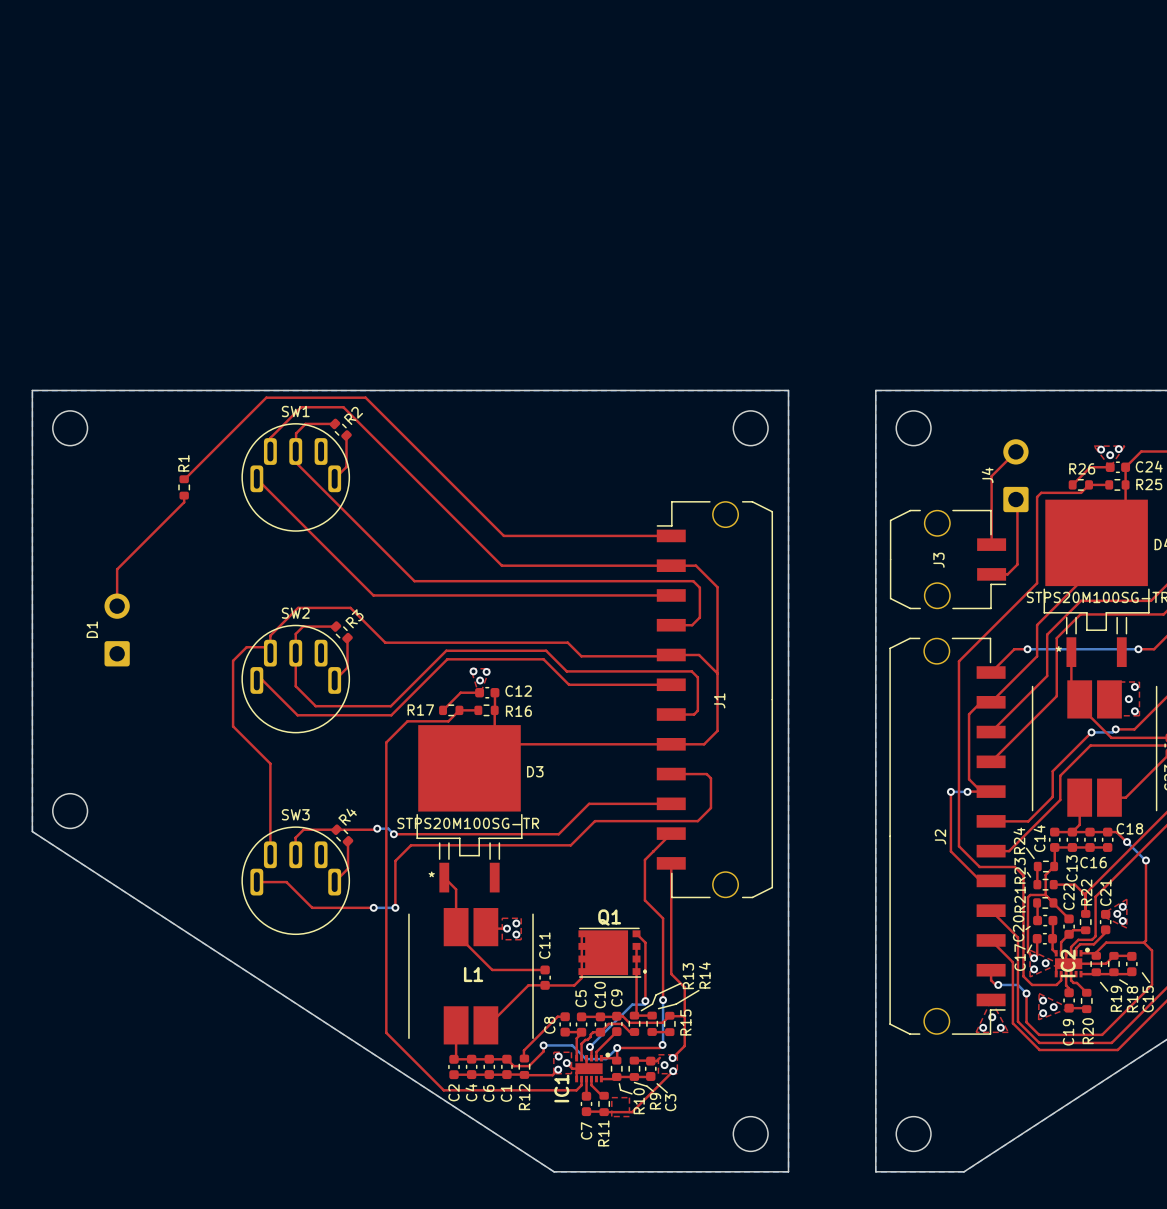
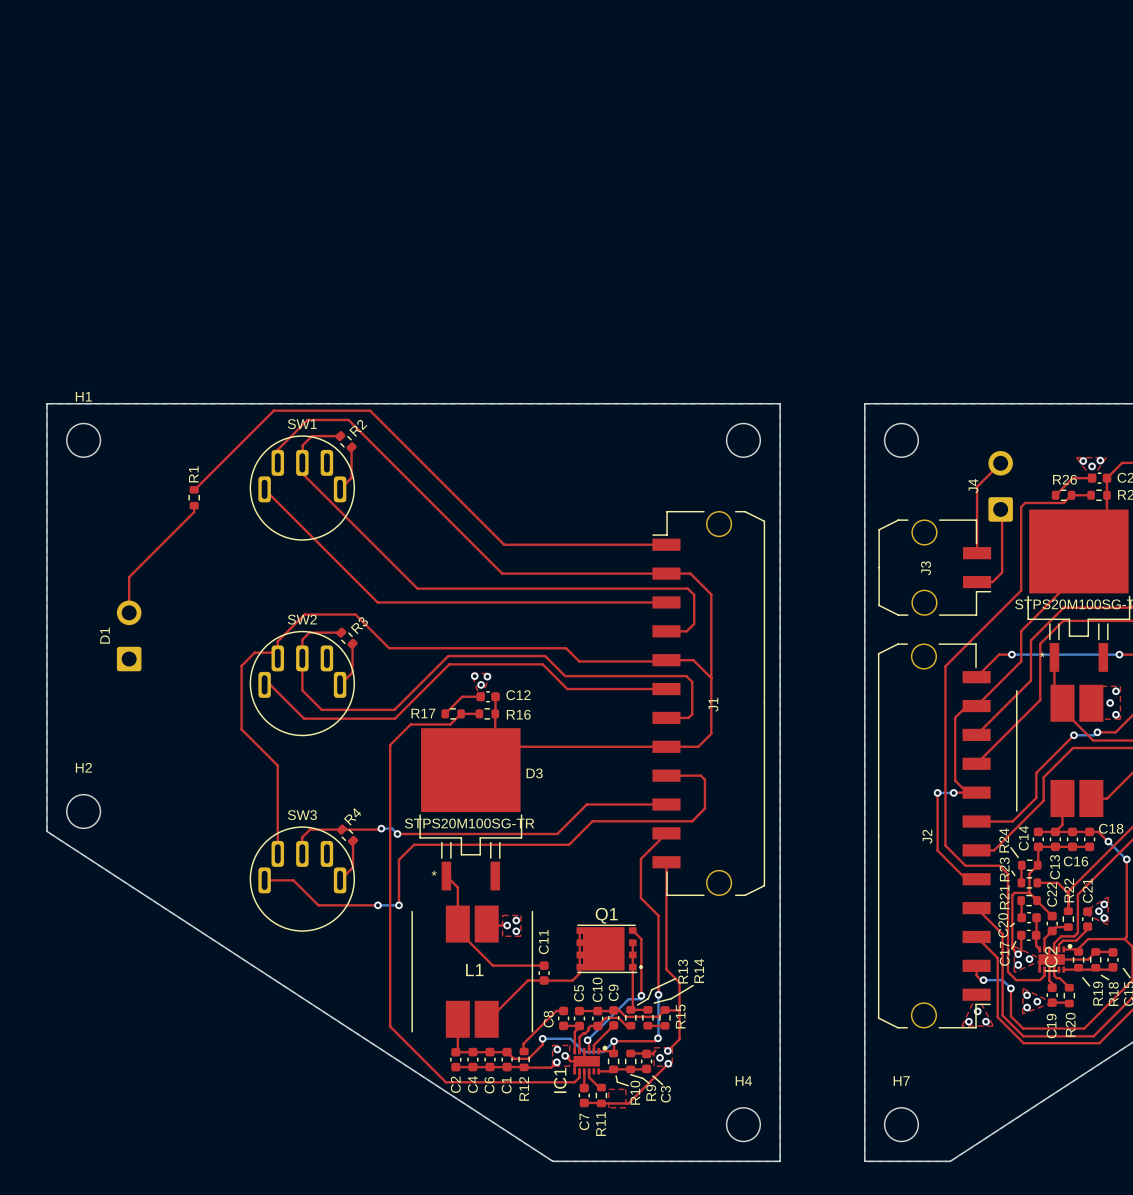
H1 name: none -> H1 (83, 396)
H2 name: none -> H2 (83, 767)
H4 name: none -> H4 (743, 1081)
H7 name: none -> H7 (901, 1081)

